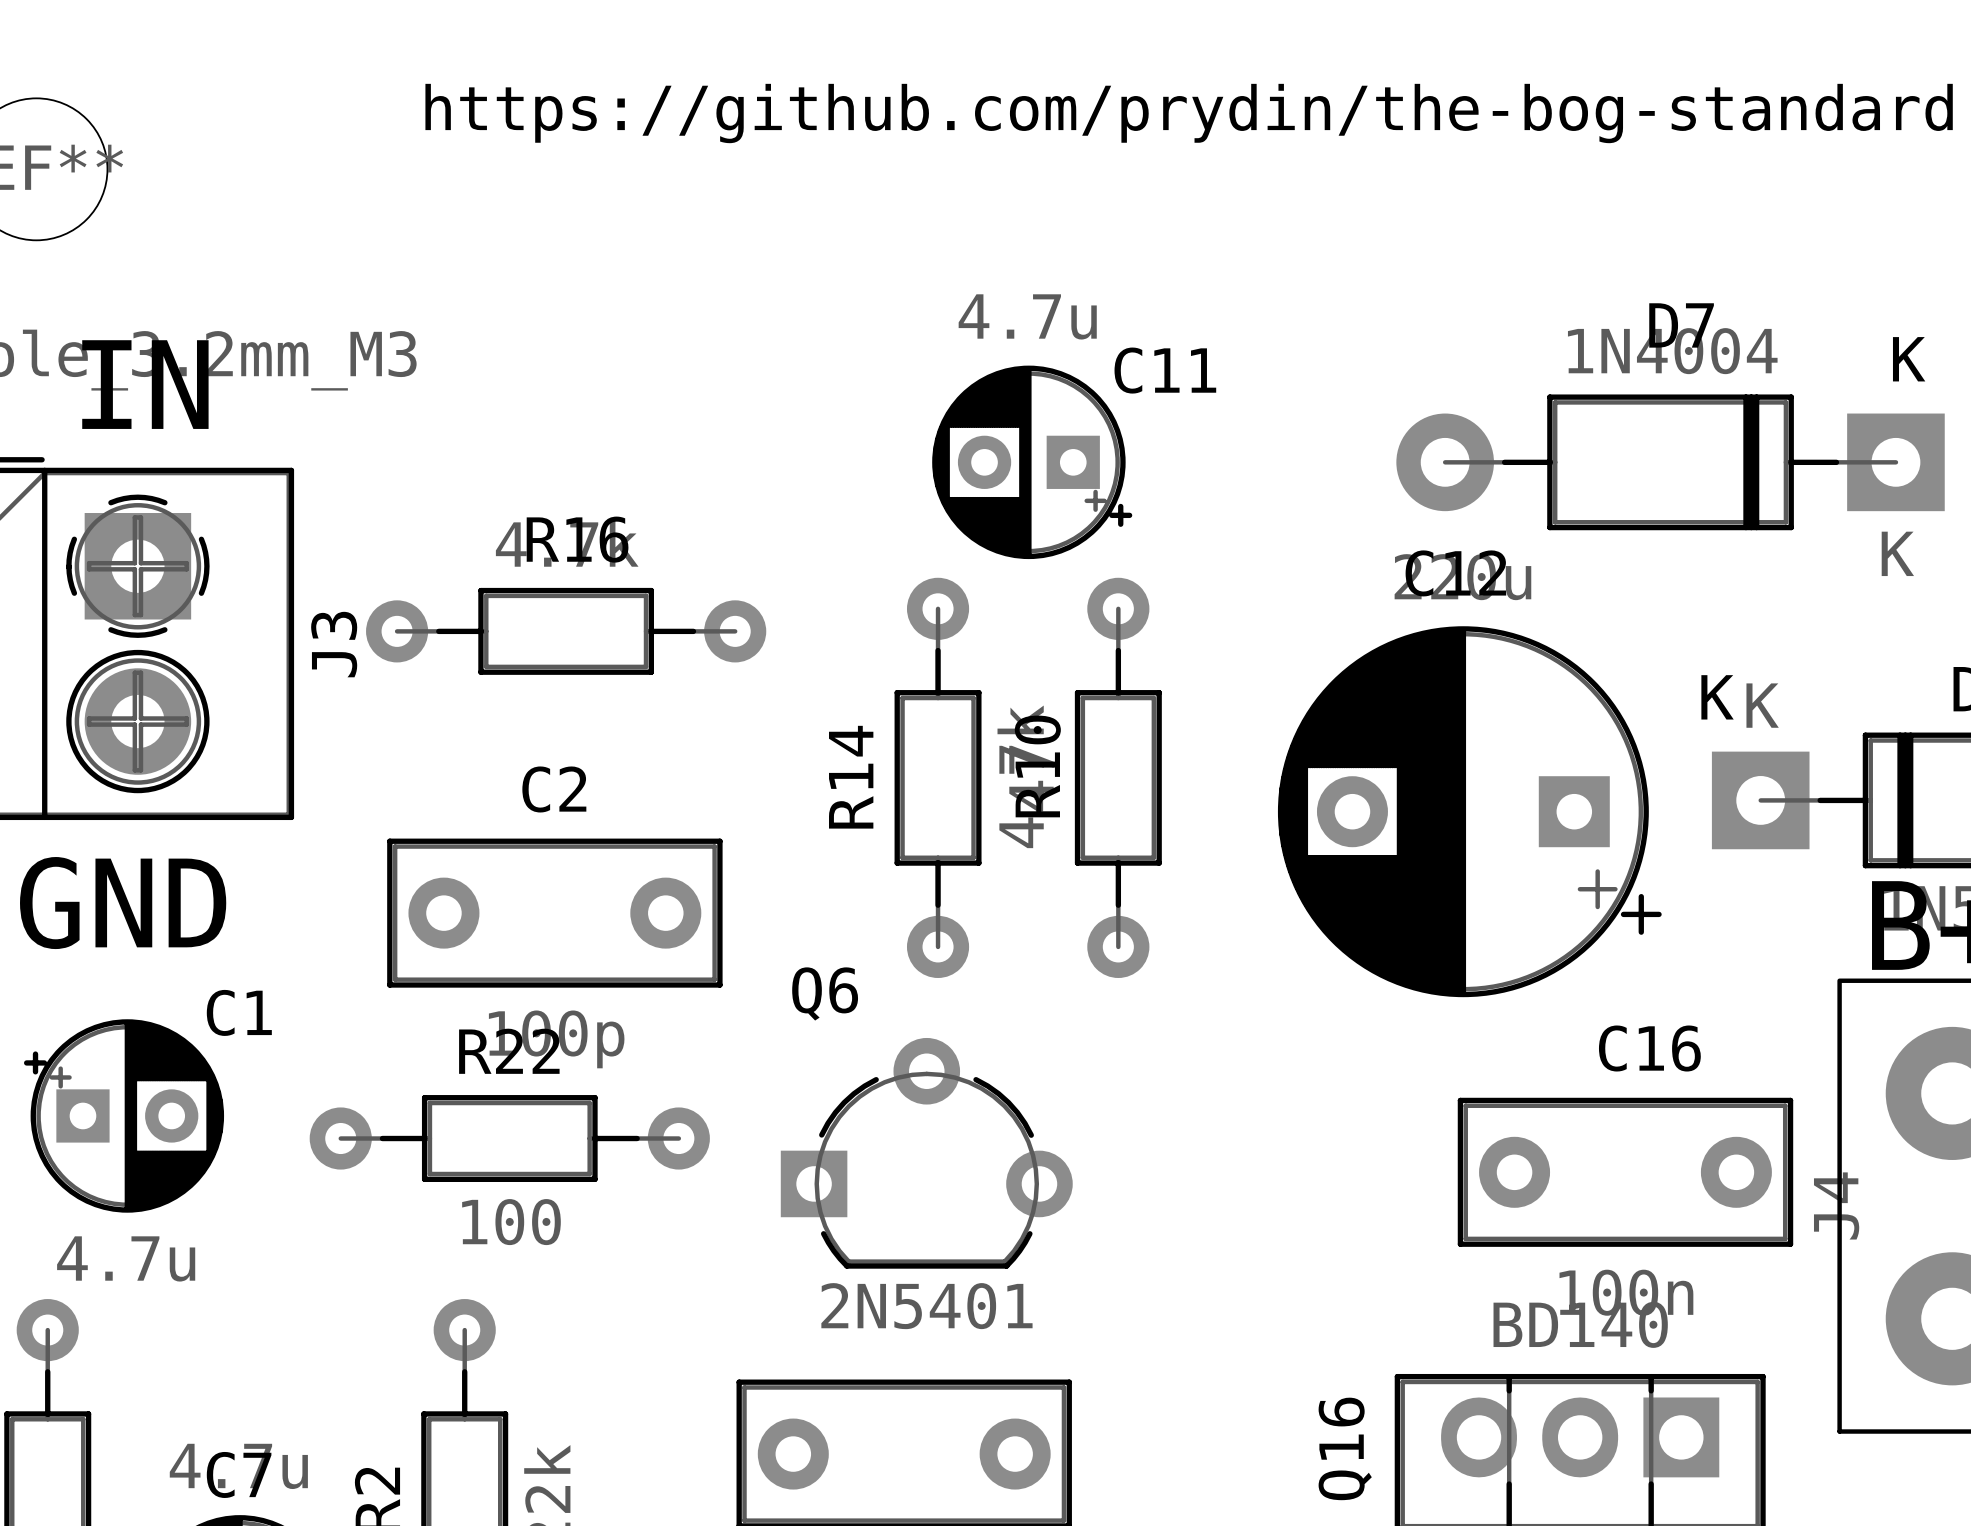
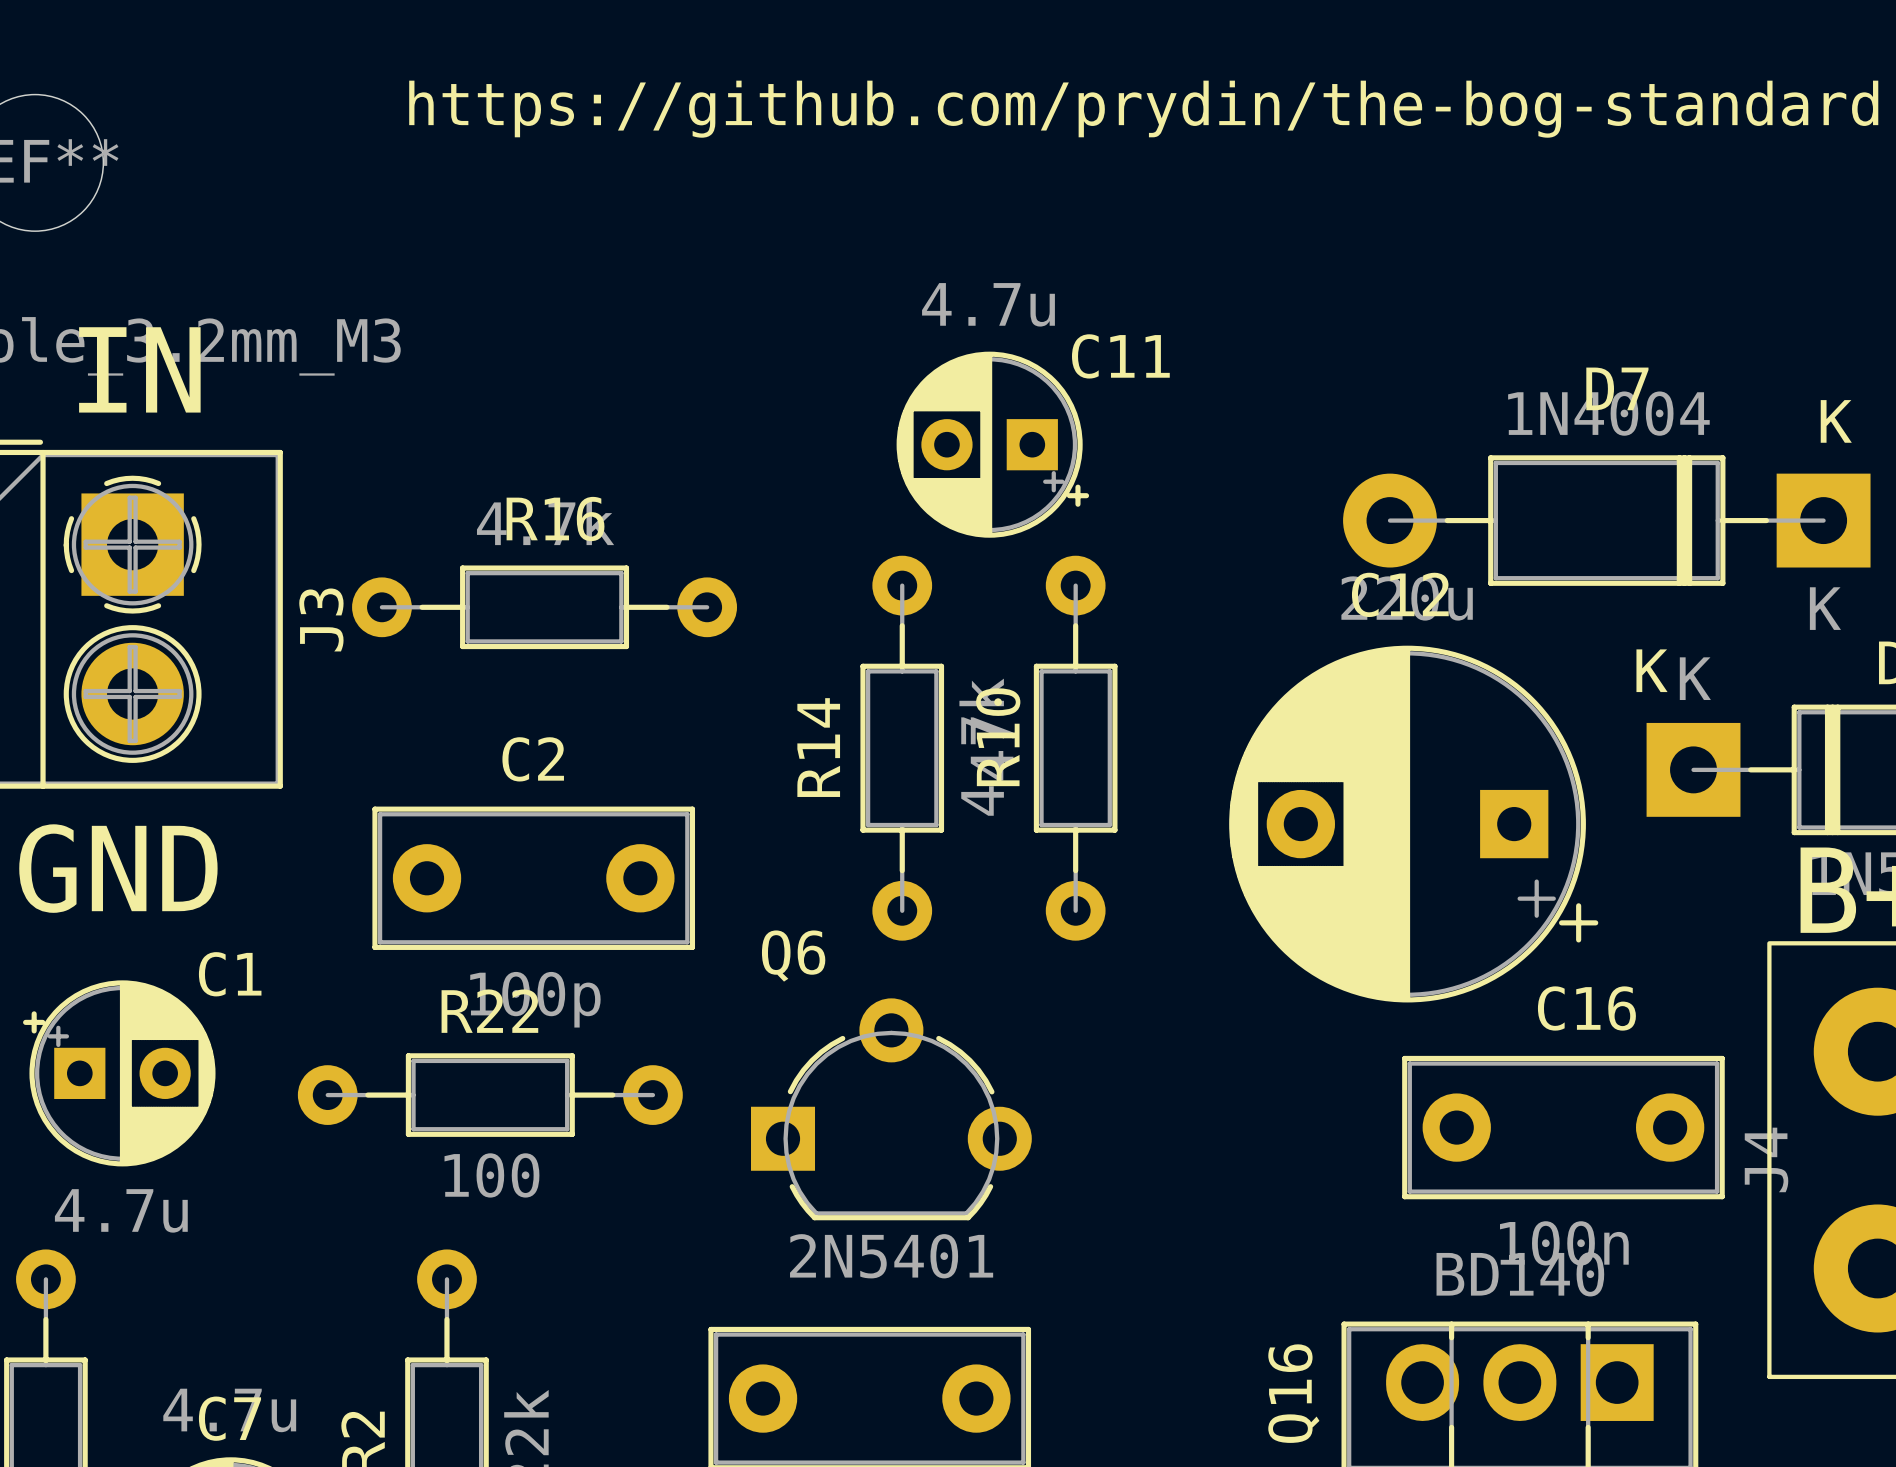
D7 position: (1670, 462) -> (1606, 520)
C12 position: (1469, 811) -> (1413, 824)

